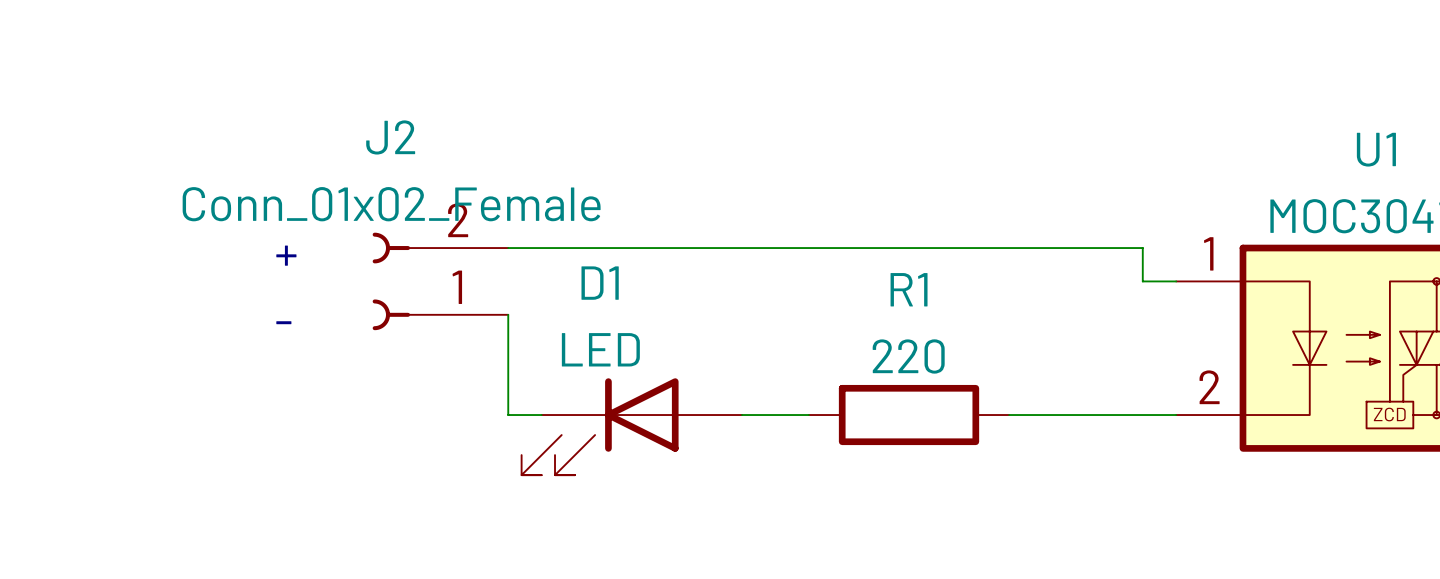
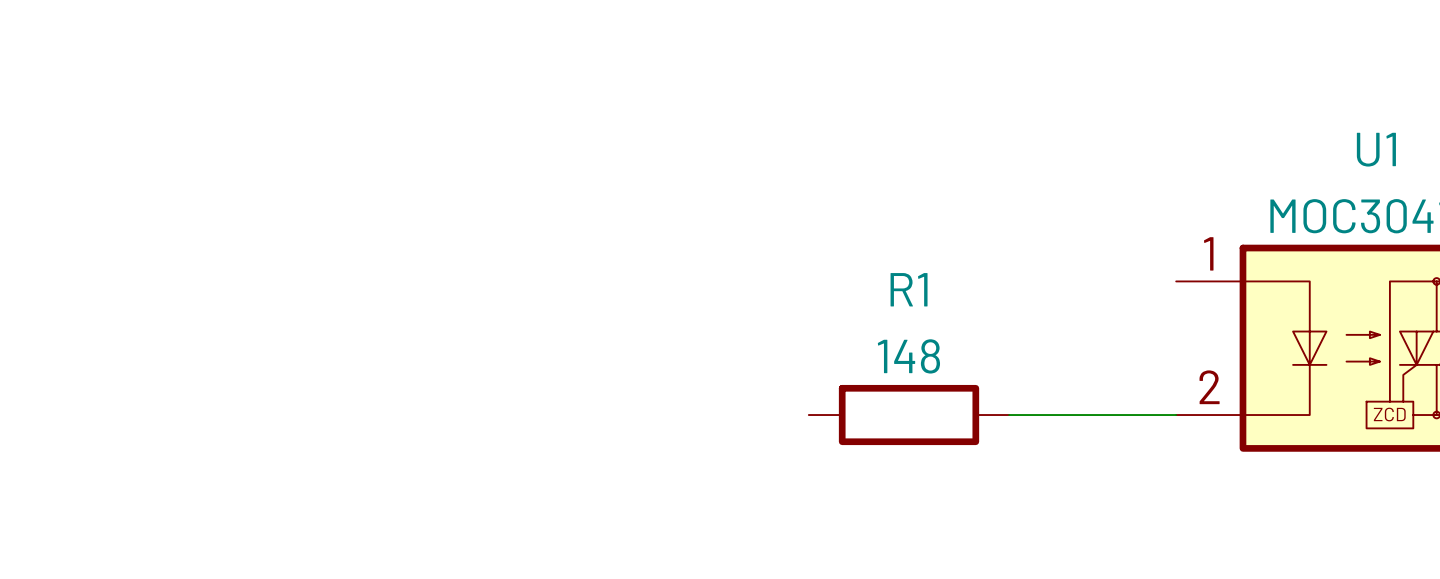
wire: (508, 248) (1142, 248) (1142, 281) (1176, 281) -> none
text: + (286, 255) -> none
J2: Conn_01x02_Female (440, 281) -> none
wire: (508, 314) (508, 415) (541, 415) -> none
text: - (283, 322) -> none
R1 value: 220 (908, 356) -> 148 (908, 356)
wire: (742, 415) (808, 415) -> none
D1: LED (631, 426) -> none

